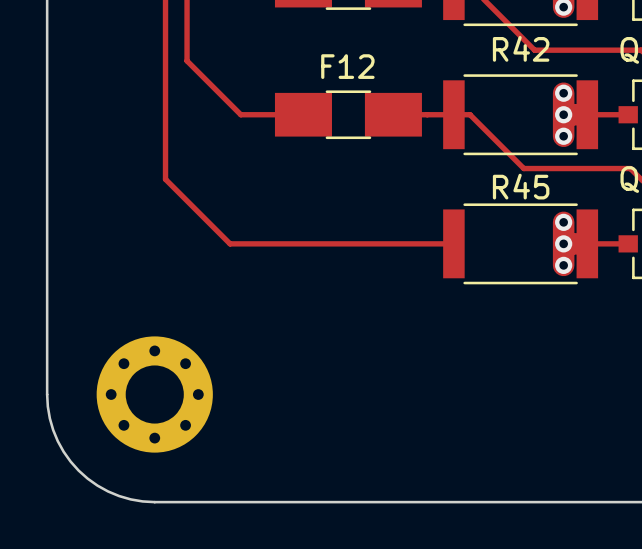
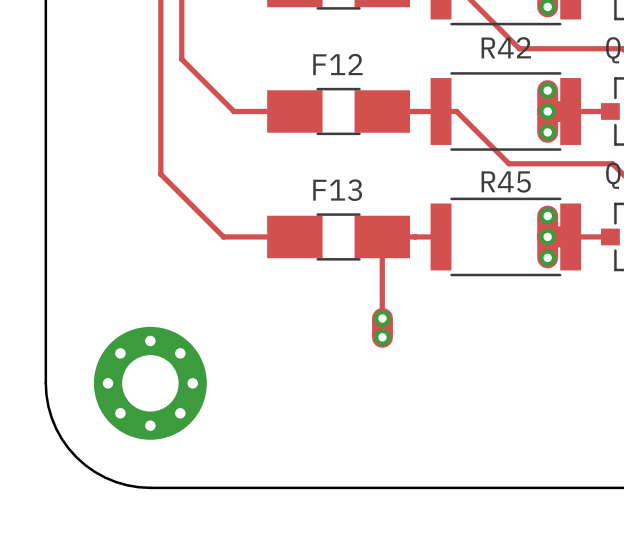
track: (303, 243) (393, 243) -> (382, 318) (382, 236)
F13: none -> (338, 236)
track: none -> (382, 318) (382, 337)
via: none -> (382, 318)
via: none -> (382, 337)

